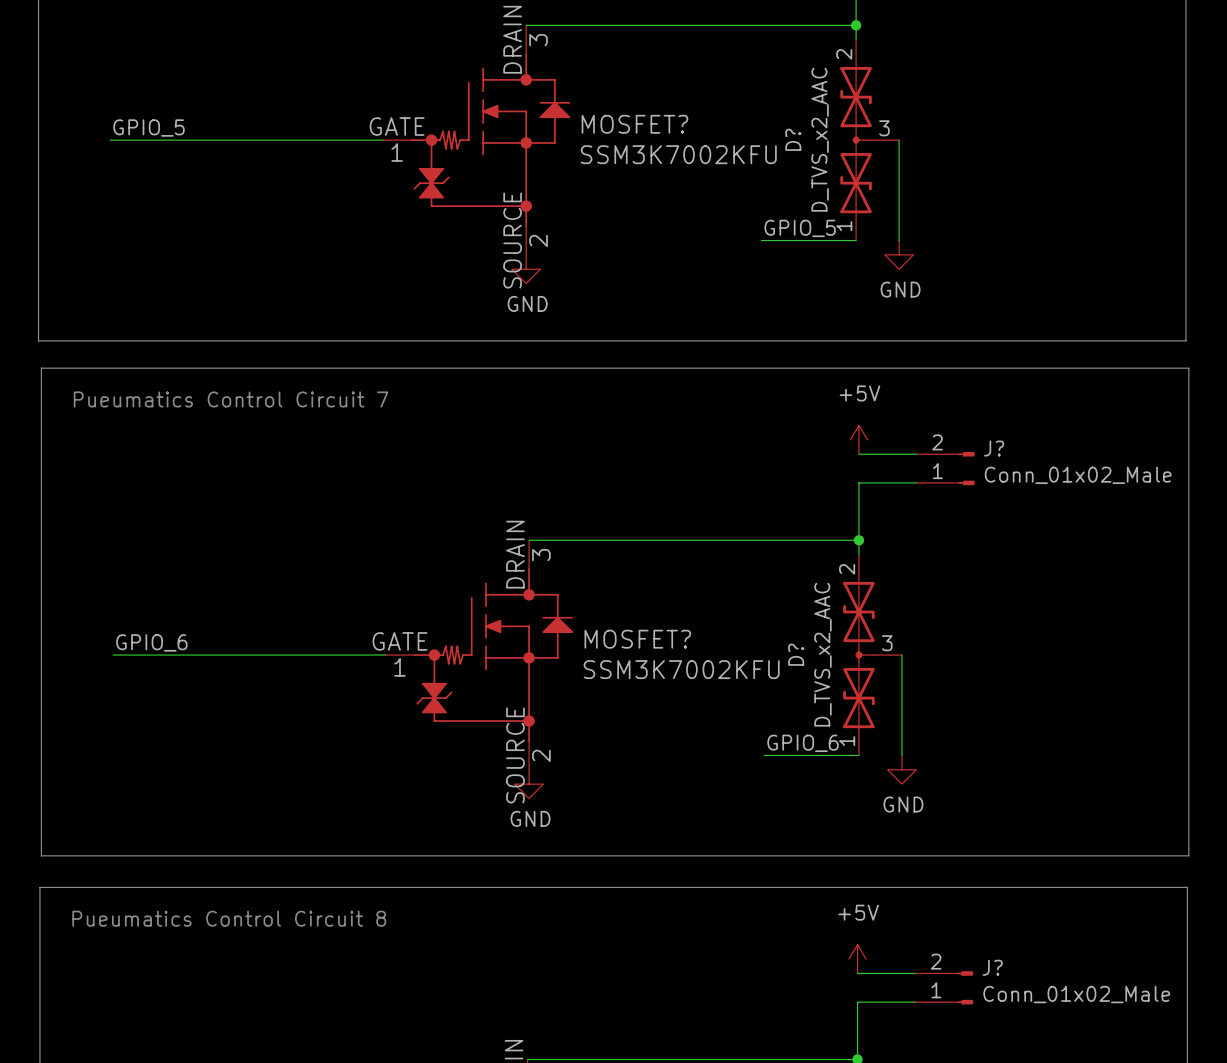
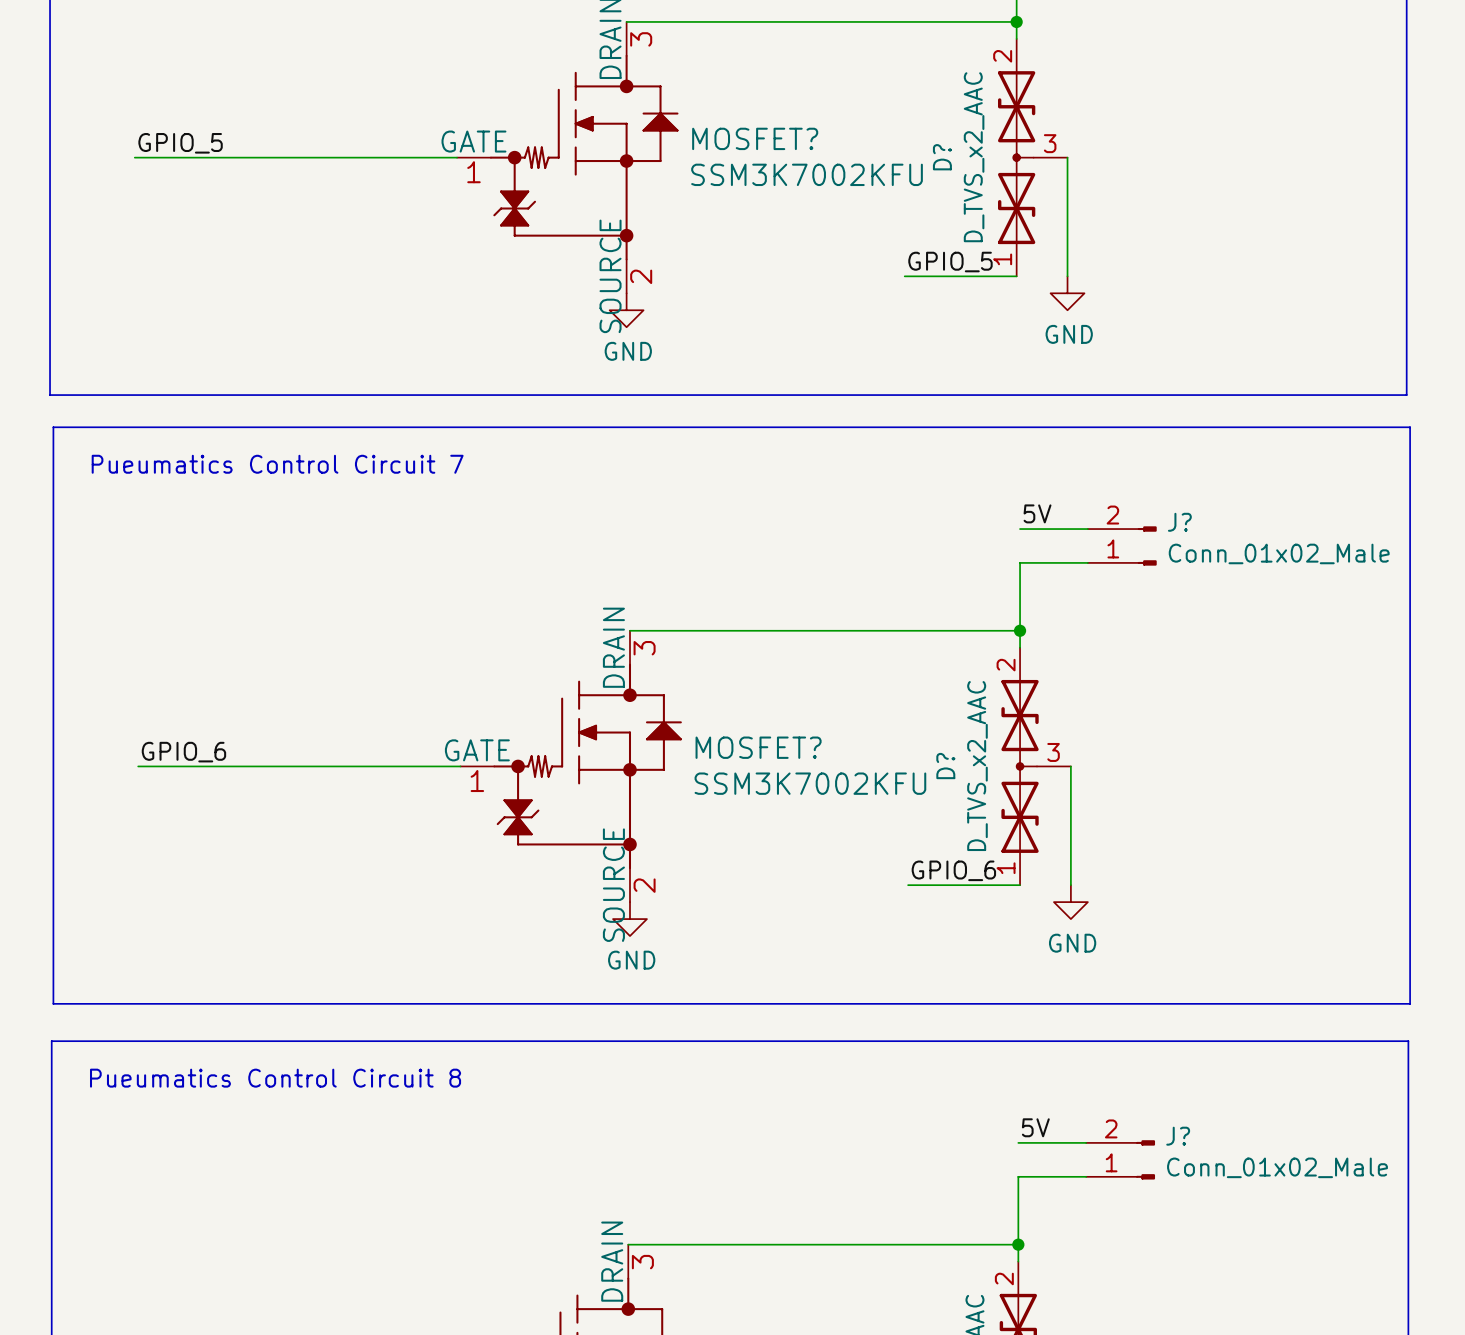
power symbol: +5V (858, 439) -> none
label: none -> 5V (1037, 513)
power symbol: +5V (857, 959) -> none
label: none -> 5V (1035, 1127)

